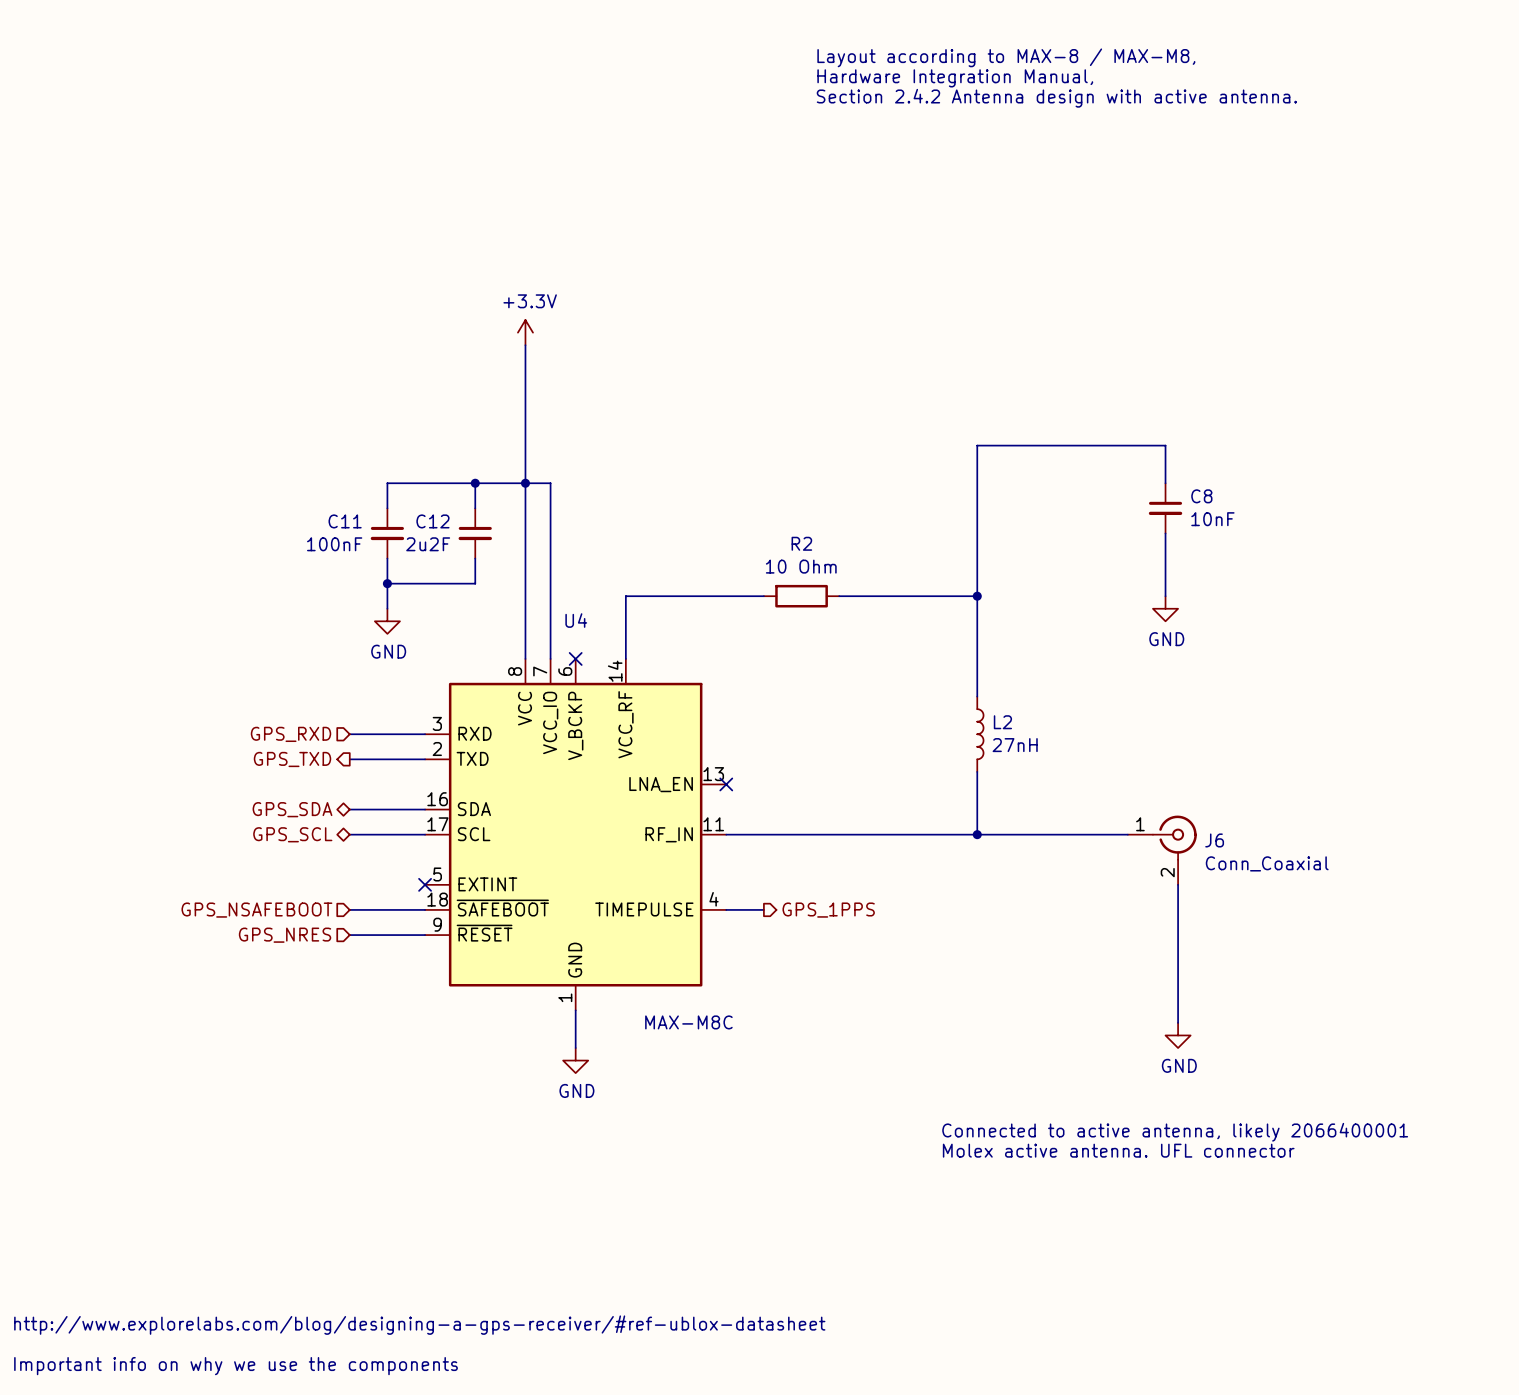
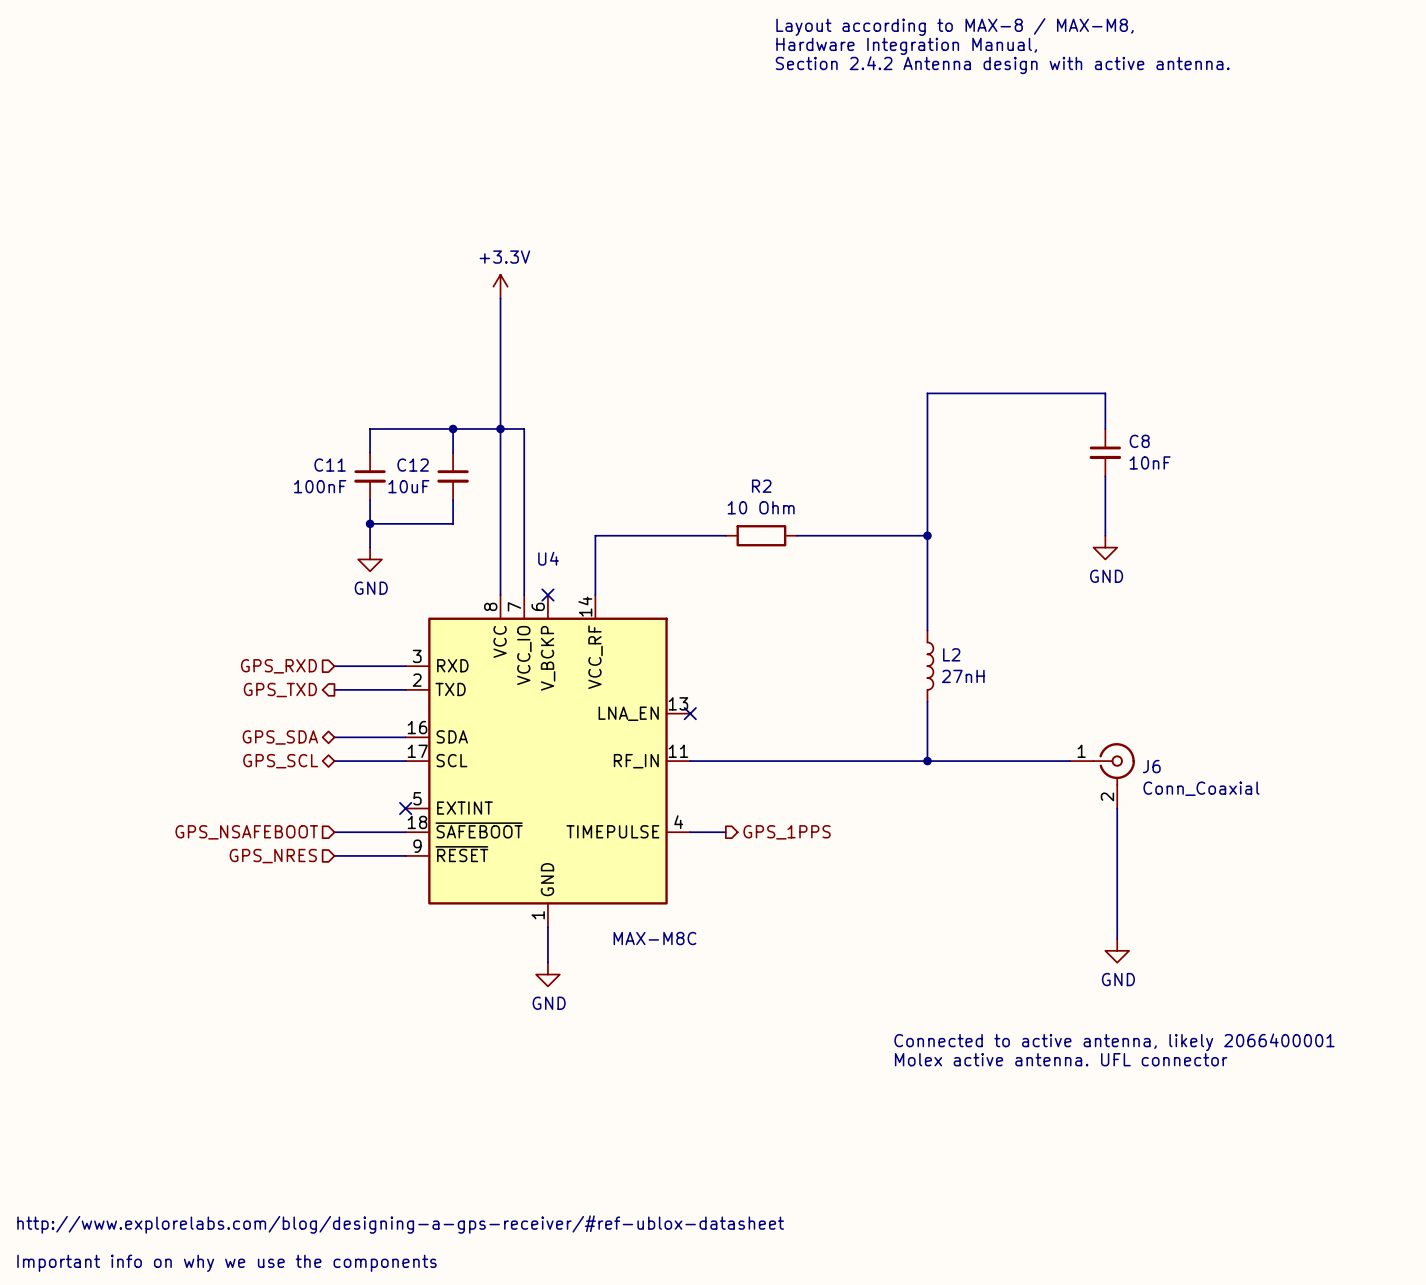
C12 value: 2u2F (428, 544) -> 10uF (408, 486)

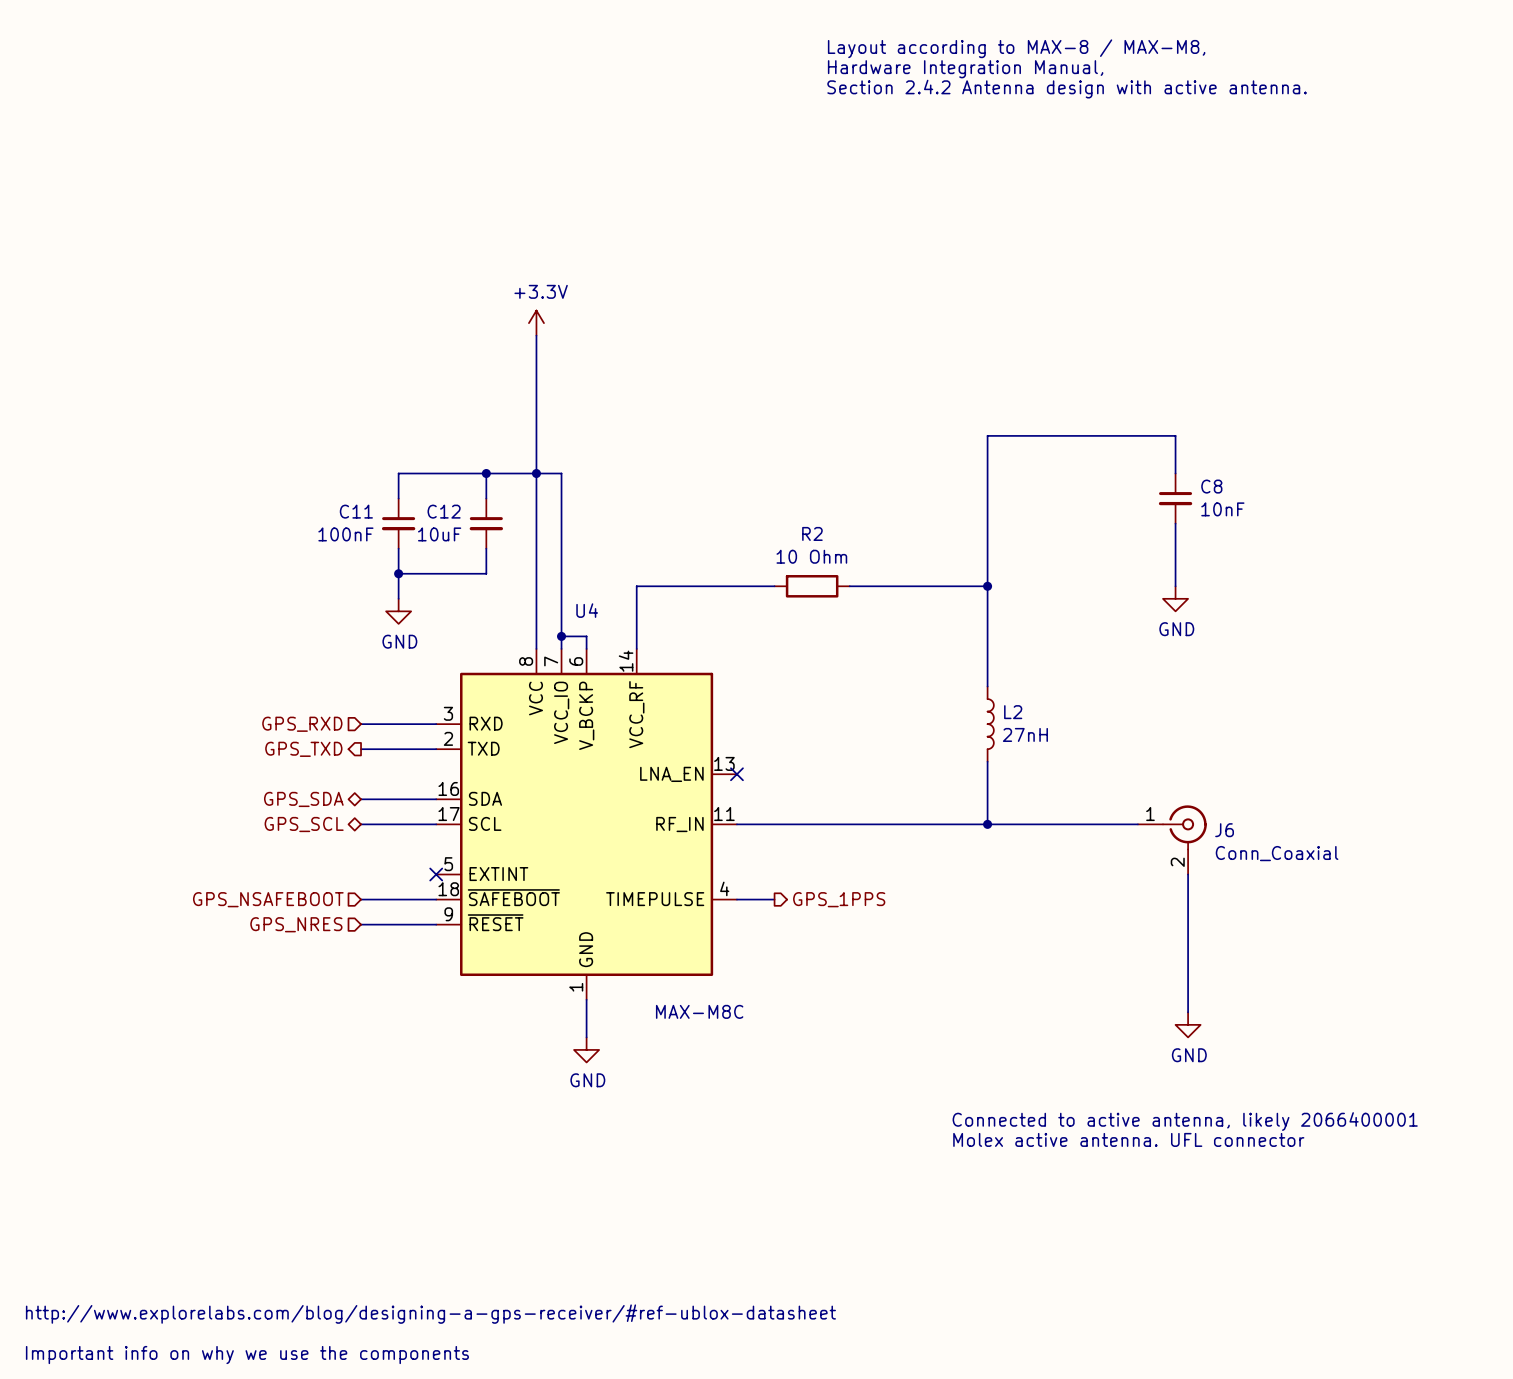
wire: none -> (561, 636) (586, 636) (586, 648)
junction: none -> (561, 636)
no-connect mark: (547, 595) -> none

